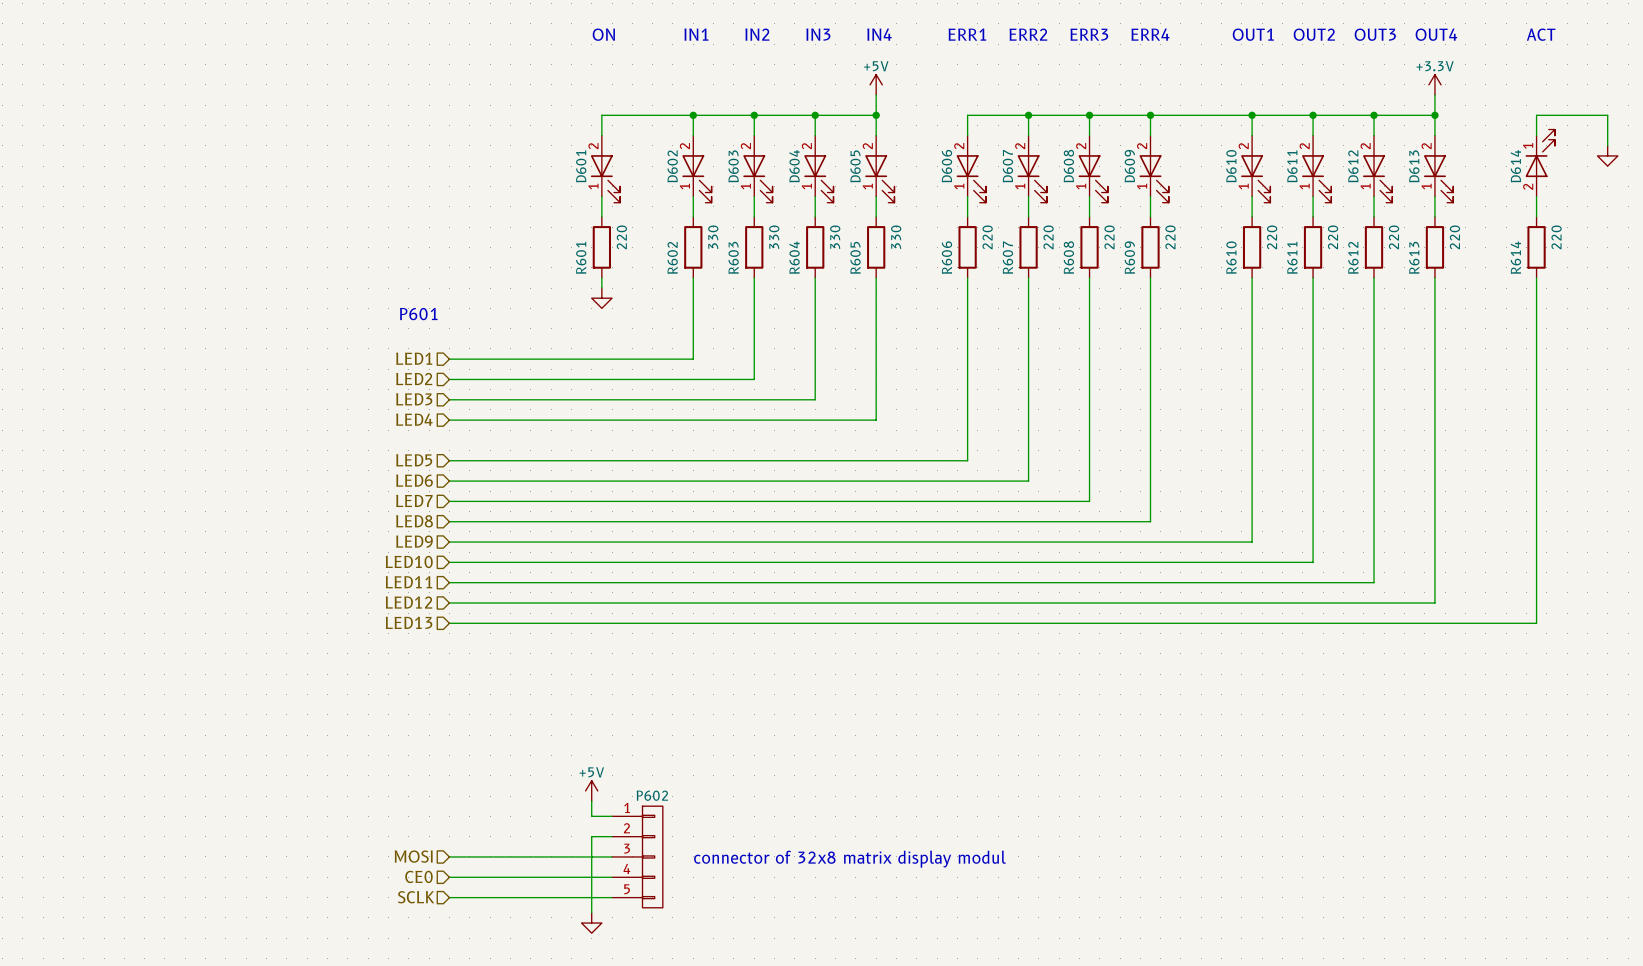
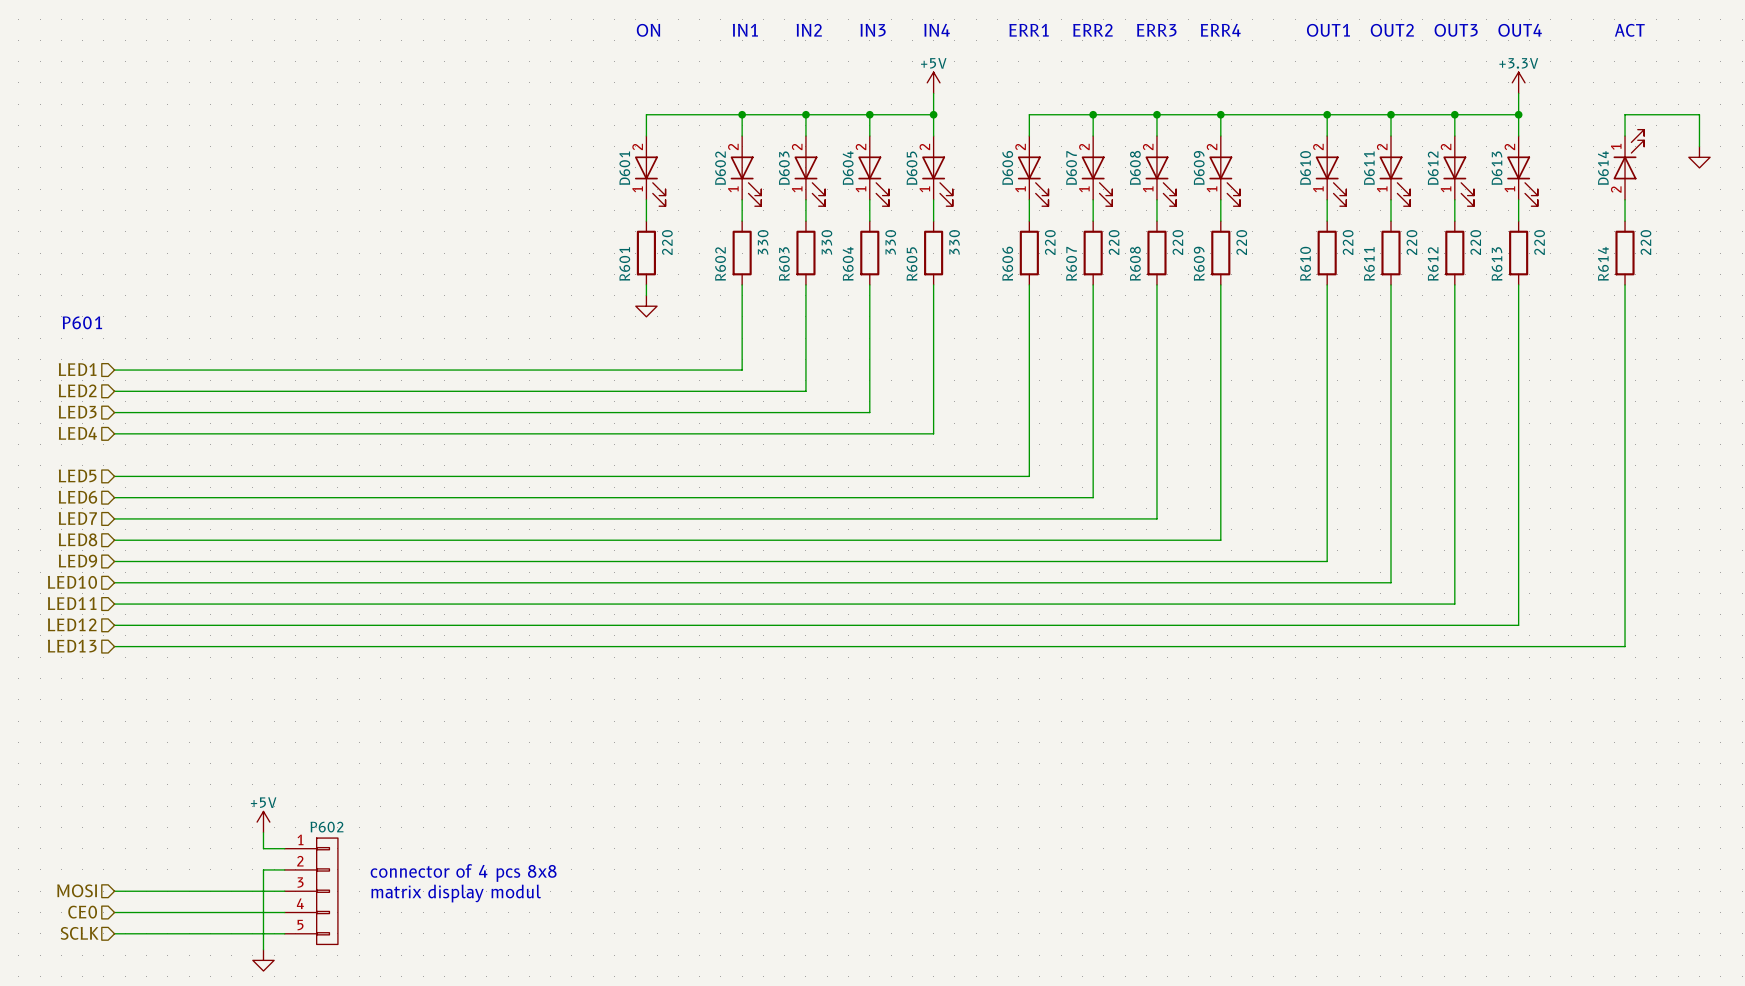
text: none -> P601 (82, 322)
text: P601 (418, 314) -> none
hierarchical label: none -> LED1 (77, 369)
hierarchical label: LED1 (414, 358) -> none
wire: none -> (114, 370) (486, 370)
hierarchical label: none -> LED2 (77, 390)
wire: none -> (114, 391) (486, 391)
hierarchical label: LED2 (414, 379) -> none
hierarchical label: none -> LED3 (77, 412)
wire: none -> (114, 412) (486, 412)
hierarchical label: LED3 (414, 399) -> none
hierarchical label: none -> LED4 (77, 433)
hierarchical label: LED4 (414, 419) -> none
wire: none -> (114, 433) (486, 433)
hierarchical label: none -> LED5 (77, 475)
wire: none -> (114, 476) (486, 476)
hierarchical label: LED5 (414, 460) -> none
hierarchical label: none -> LED6 (77, 497)
hierarchical label: LED6 (414, 480) -> none
wire: none -> (114, 497) (486, 497)
hierarchical label: none -> LED7 (77, 518)
hierarchical label: LED7 (414, 500) -> none
wire: none -> (114, 518) (486, 518)
hierarchical label: none -> LED8 (78, 539)
wire: none -> (114, 540) (486, 540)
hierarchical label: LED8 (414, 521) -> none
hierarchical label: none -> LED9 (77, 561)
hierarchical label: LED9 (414, 541) -> none
wire: none -> (114, 561) (486, 561)
hierarchical label: none -> LED10 (72, 582)
hierarchical label: LED10 (409, 561) -> none
wire: none -> (114, 582) (486, 582)
hierarchical label: none -> LED11 (72, 603)
wire: none -> (114, 604) (486, 604)
hierarchical label: LED11 (409, 582) -> none
hierarchical label: none -> LED12 (72, 624)
wire: none -> (114, 625) (486, 625)
hierarchical label: LED12 (409, 602) -> none
hierarchical label: none -> LED13 (72, 646)
hierarchical label: LED13 (409, 622) -> none
wire: none -> (114, 646) (486, 646)
power symbol: none -> +5V (263, 822)
power symbol: +5V (591, 790) -> none
wire: none -> (263, 832) (263, 848) (284, 848)
wire: (591, 801) (591, 816) (612, 816) -> none
wire: none -> (284, 869) (263, 869) (263, 949)
wire: (612, 836) (591, 836) (591, 912) -> none
text: none -> connector of 4 pcs 8x8 (463, 872)
hierarchical label: none -> MOSI (77, 890)
wire: none -> (114, 891) (284, 891)
hierarchical label: MOSI (413, 856) -> none
wire: (449, 856) (612, 856) -> none
P602 position: (637, 856) -> (311, 891)
text: none -> matrix display modul (456, 893)
text: connector of 32x8 matrix display modul (849, 859) -> none
hierarchical label: none -> CE0 (82, 912)
hierarchical label: CE0 (418, 876) -> none
wire: none -> (114, 912) (284, 912)
wire: (449, 877) (612, 877) -> none
hierarchical label: none -> SCLK (79, 933)
wire: none -> (114, 933) (284, 933)
hierarchical label: SCLK (416, 897) -> none
wire: (449, 897) (612, 897) -> none
power symbol: none -> (263, 960)
power symbol: (591, 923) -> none

